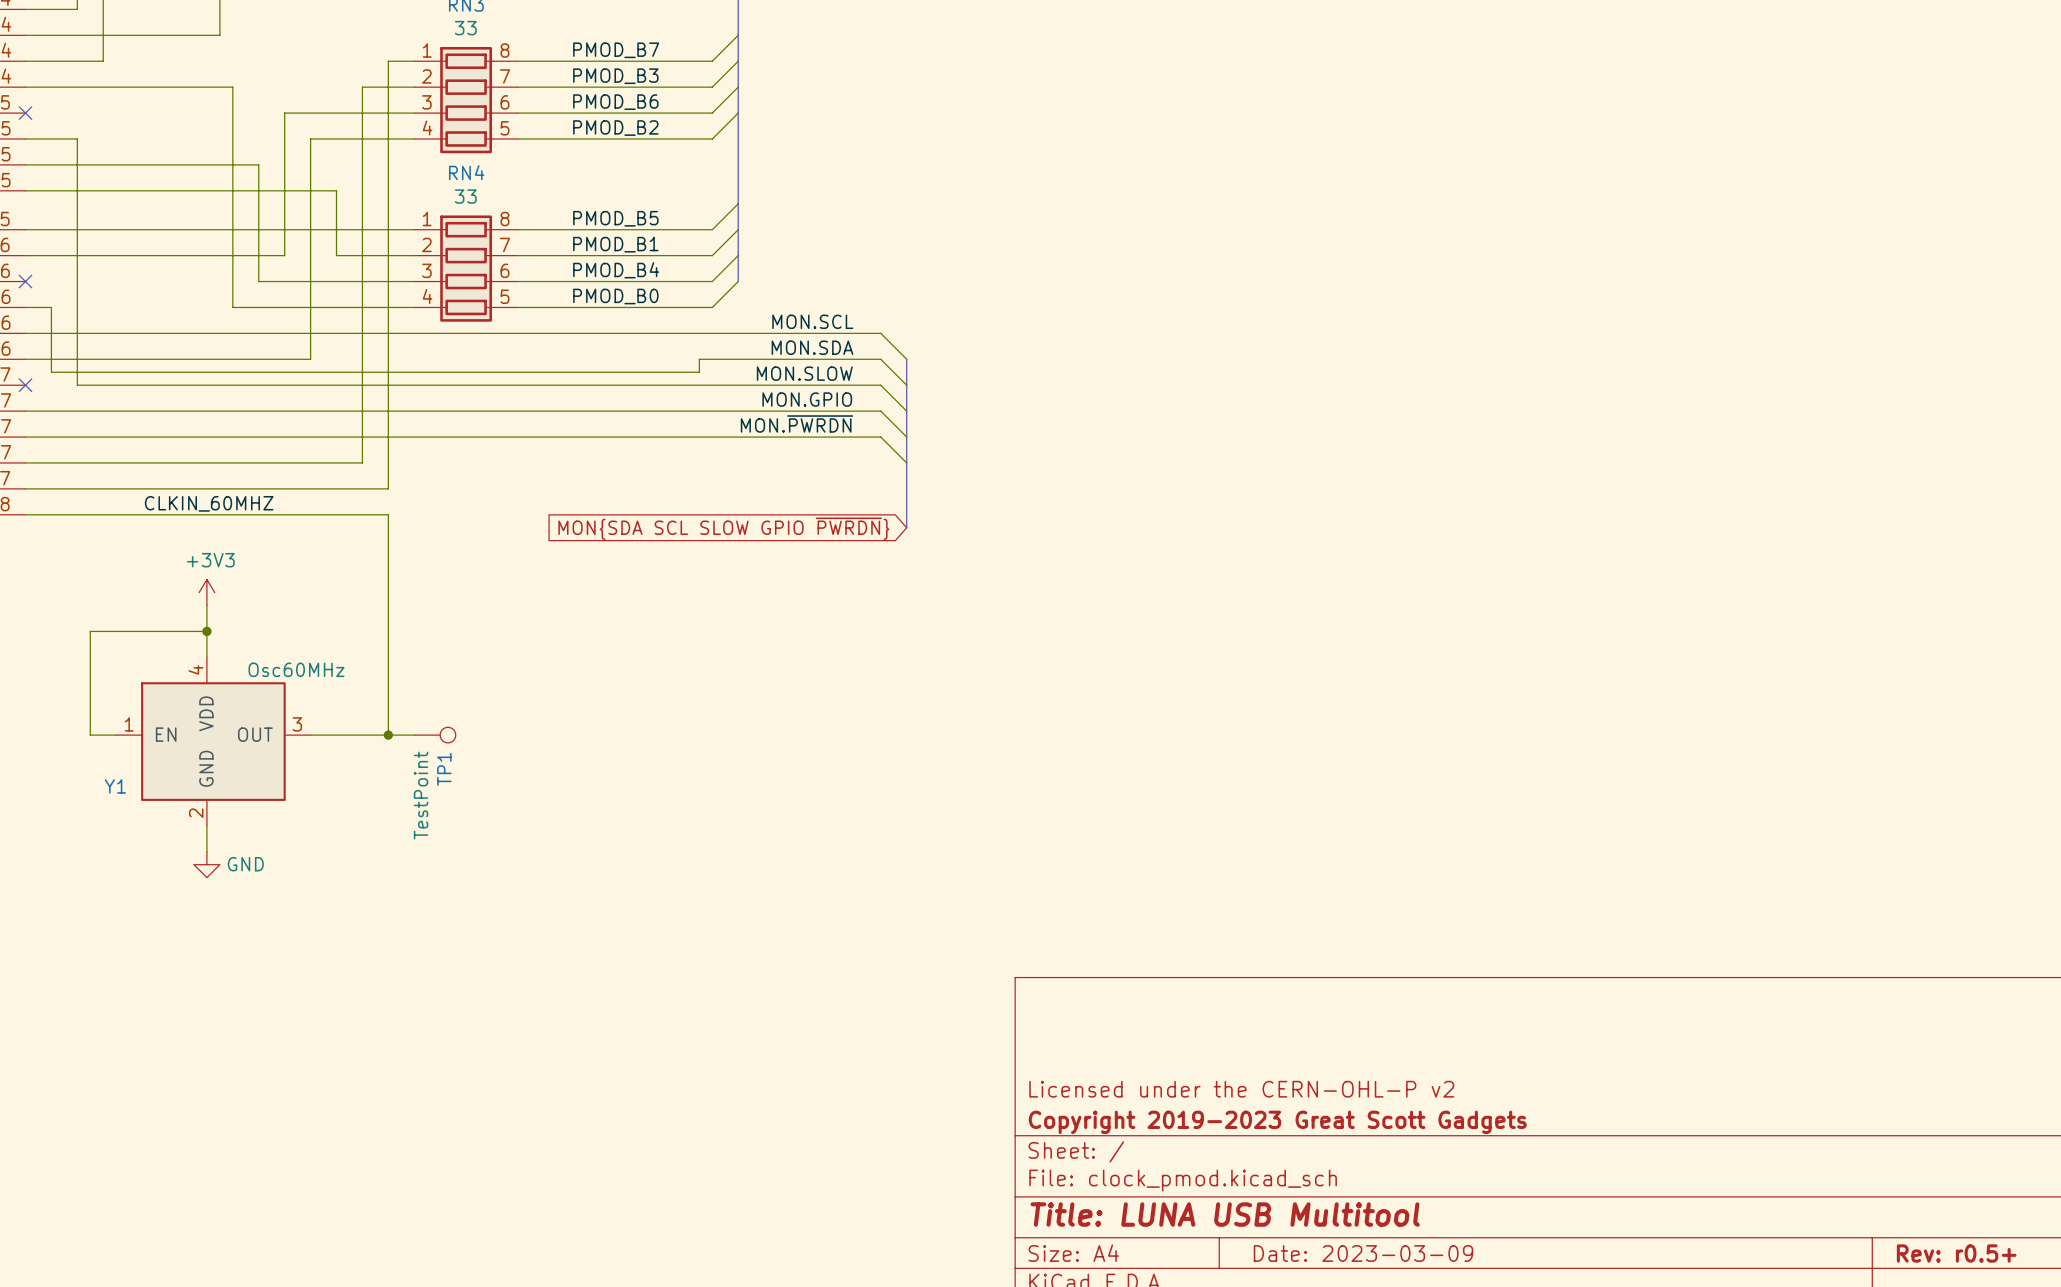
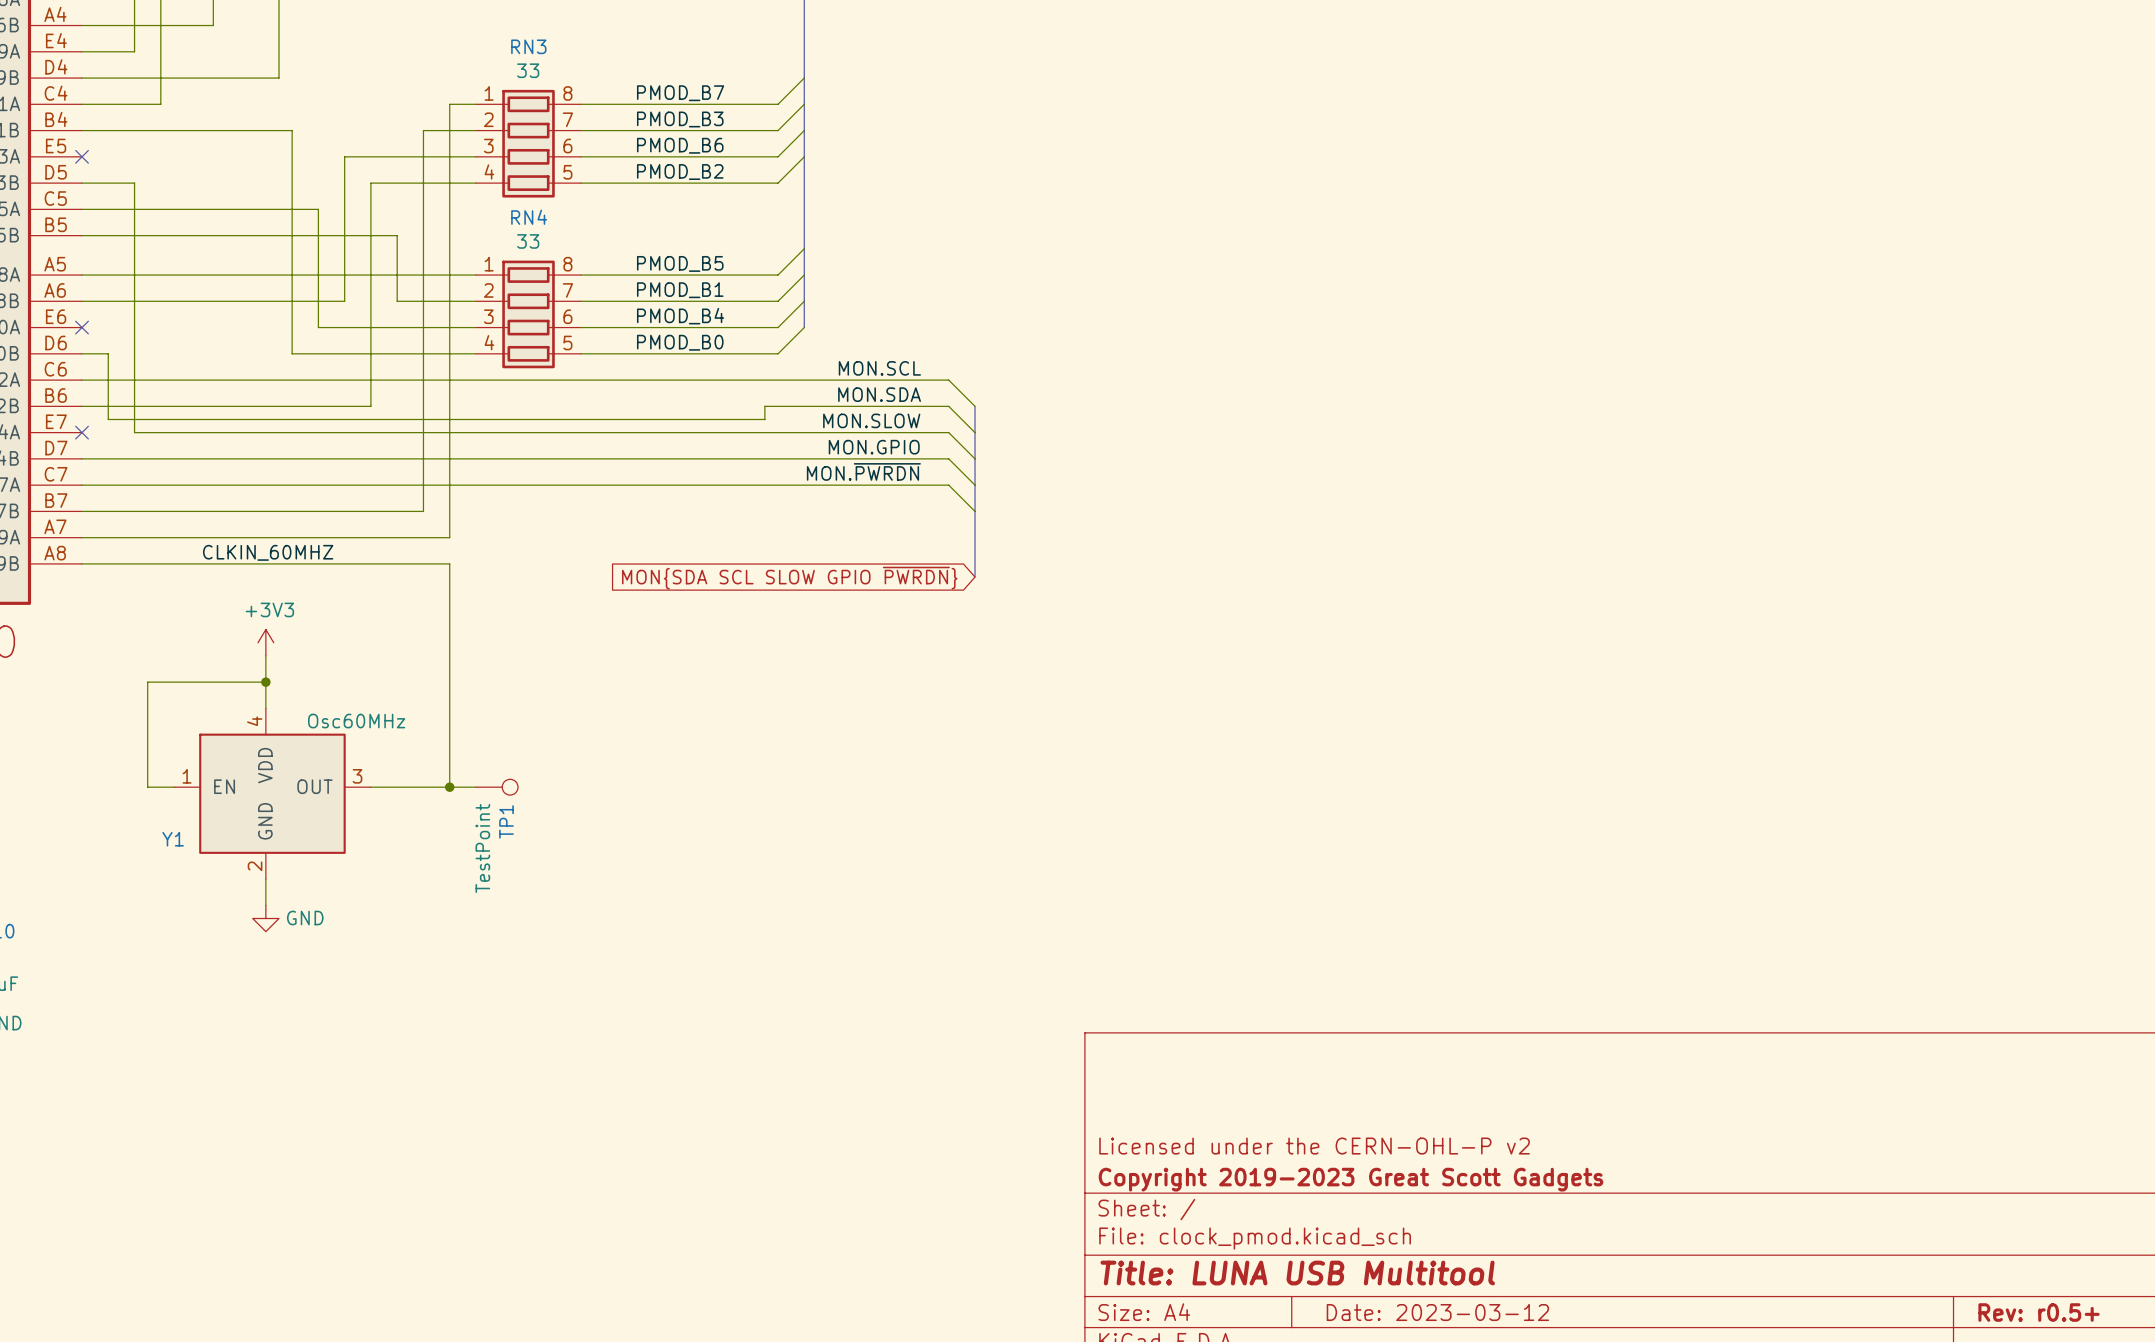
title block: Date: 2023-03-09 (1363, 1253) -> Date: 2023-03-12 (1437, 1312)

